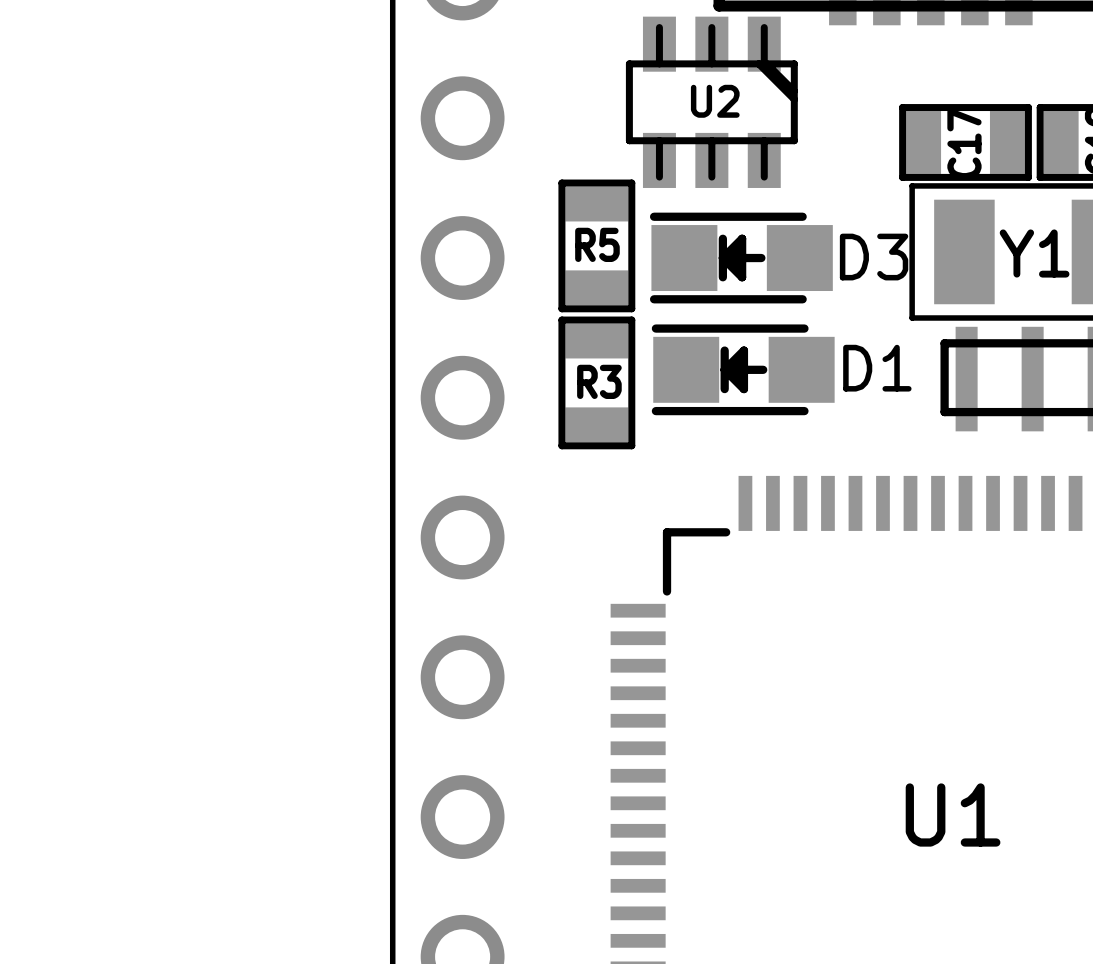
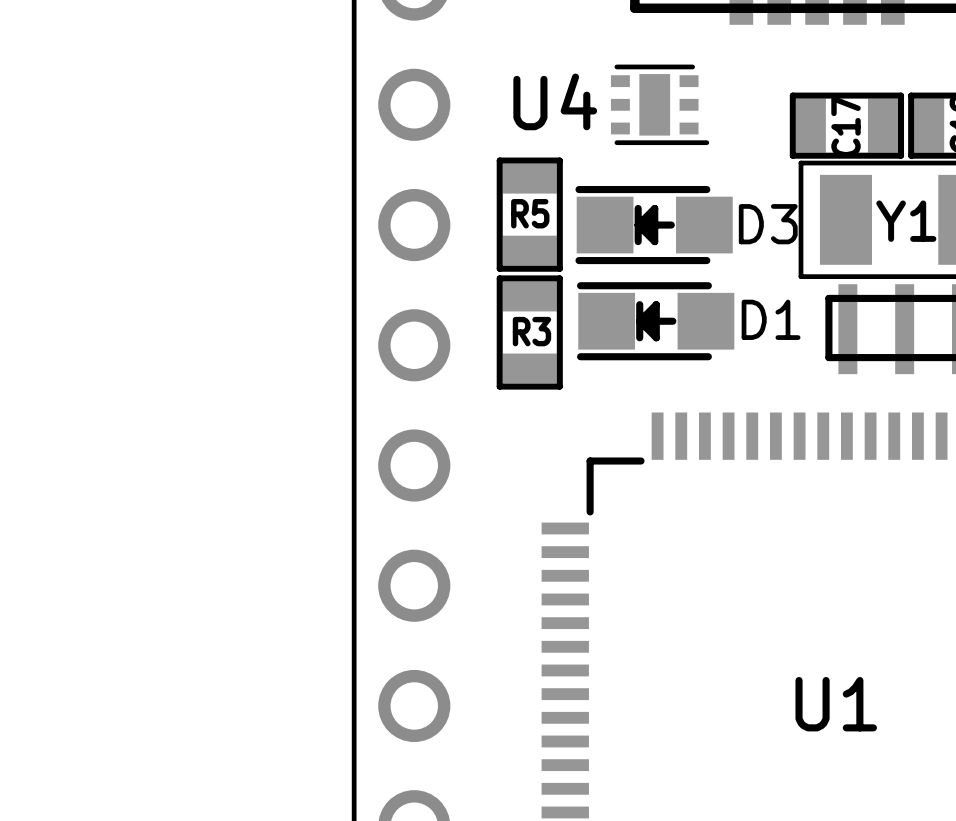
U2: (711, 102) -> none
U4: none -> (660, 104)

